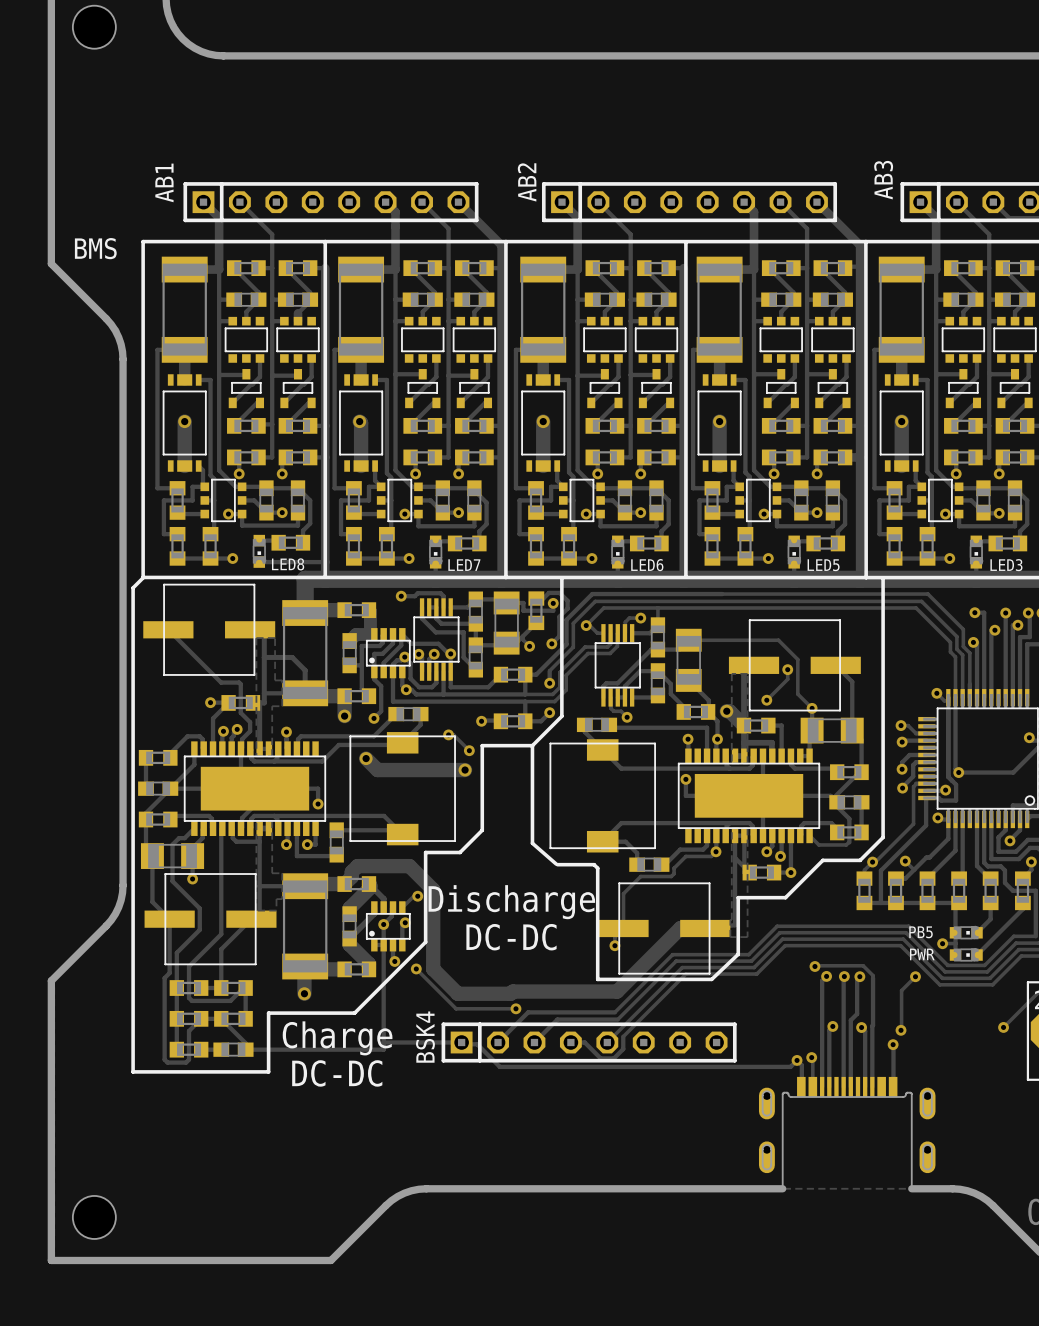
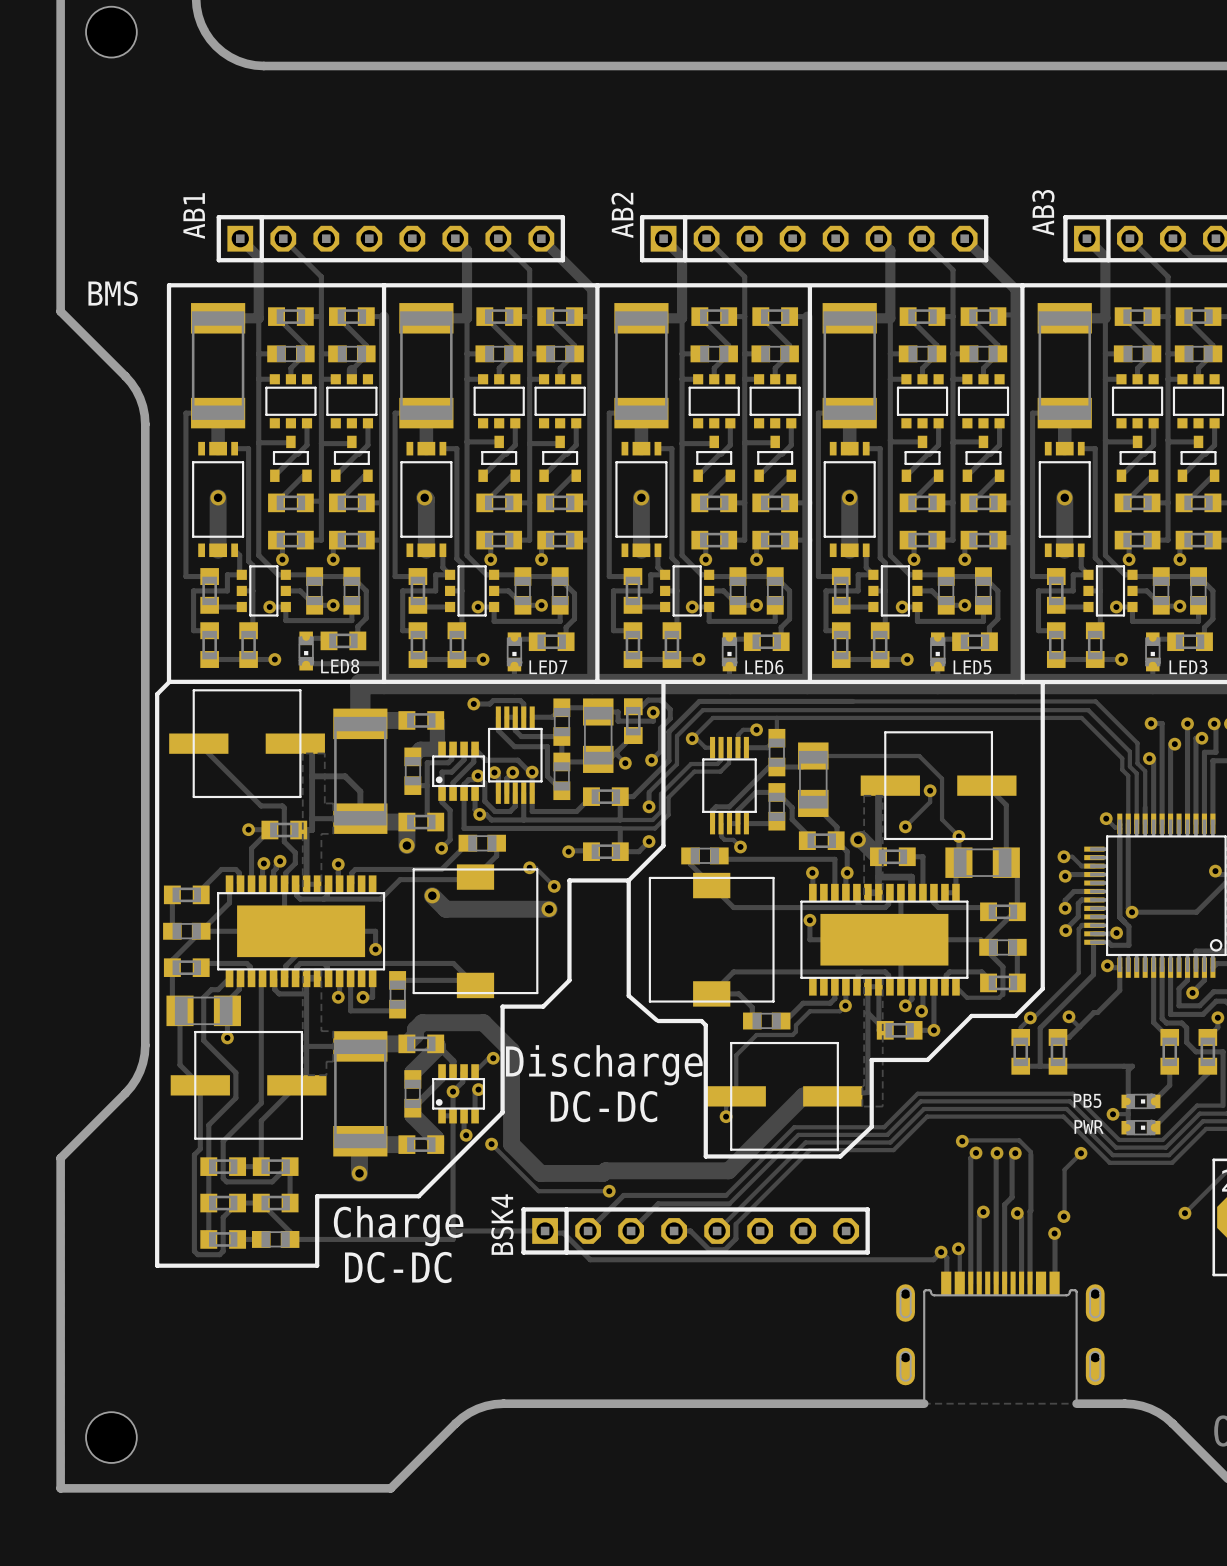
track: (955, 819) (955, 850) (927, 878) -> none
track: (962, 819) (962, 875) (959, 878) -> none
part: (927, 890) -> none
part: (959, 890) -> none

